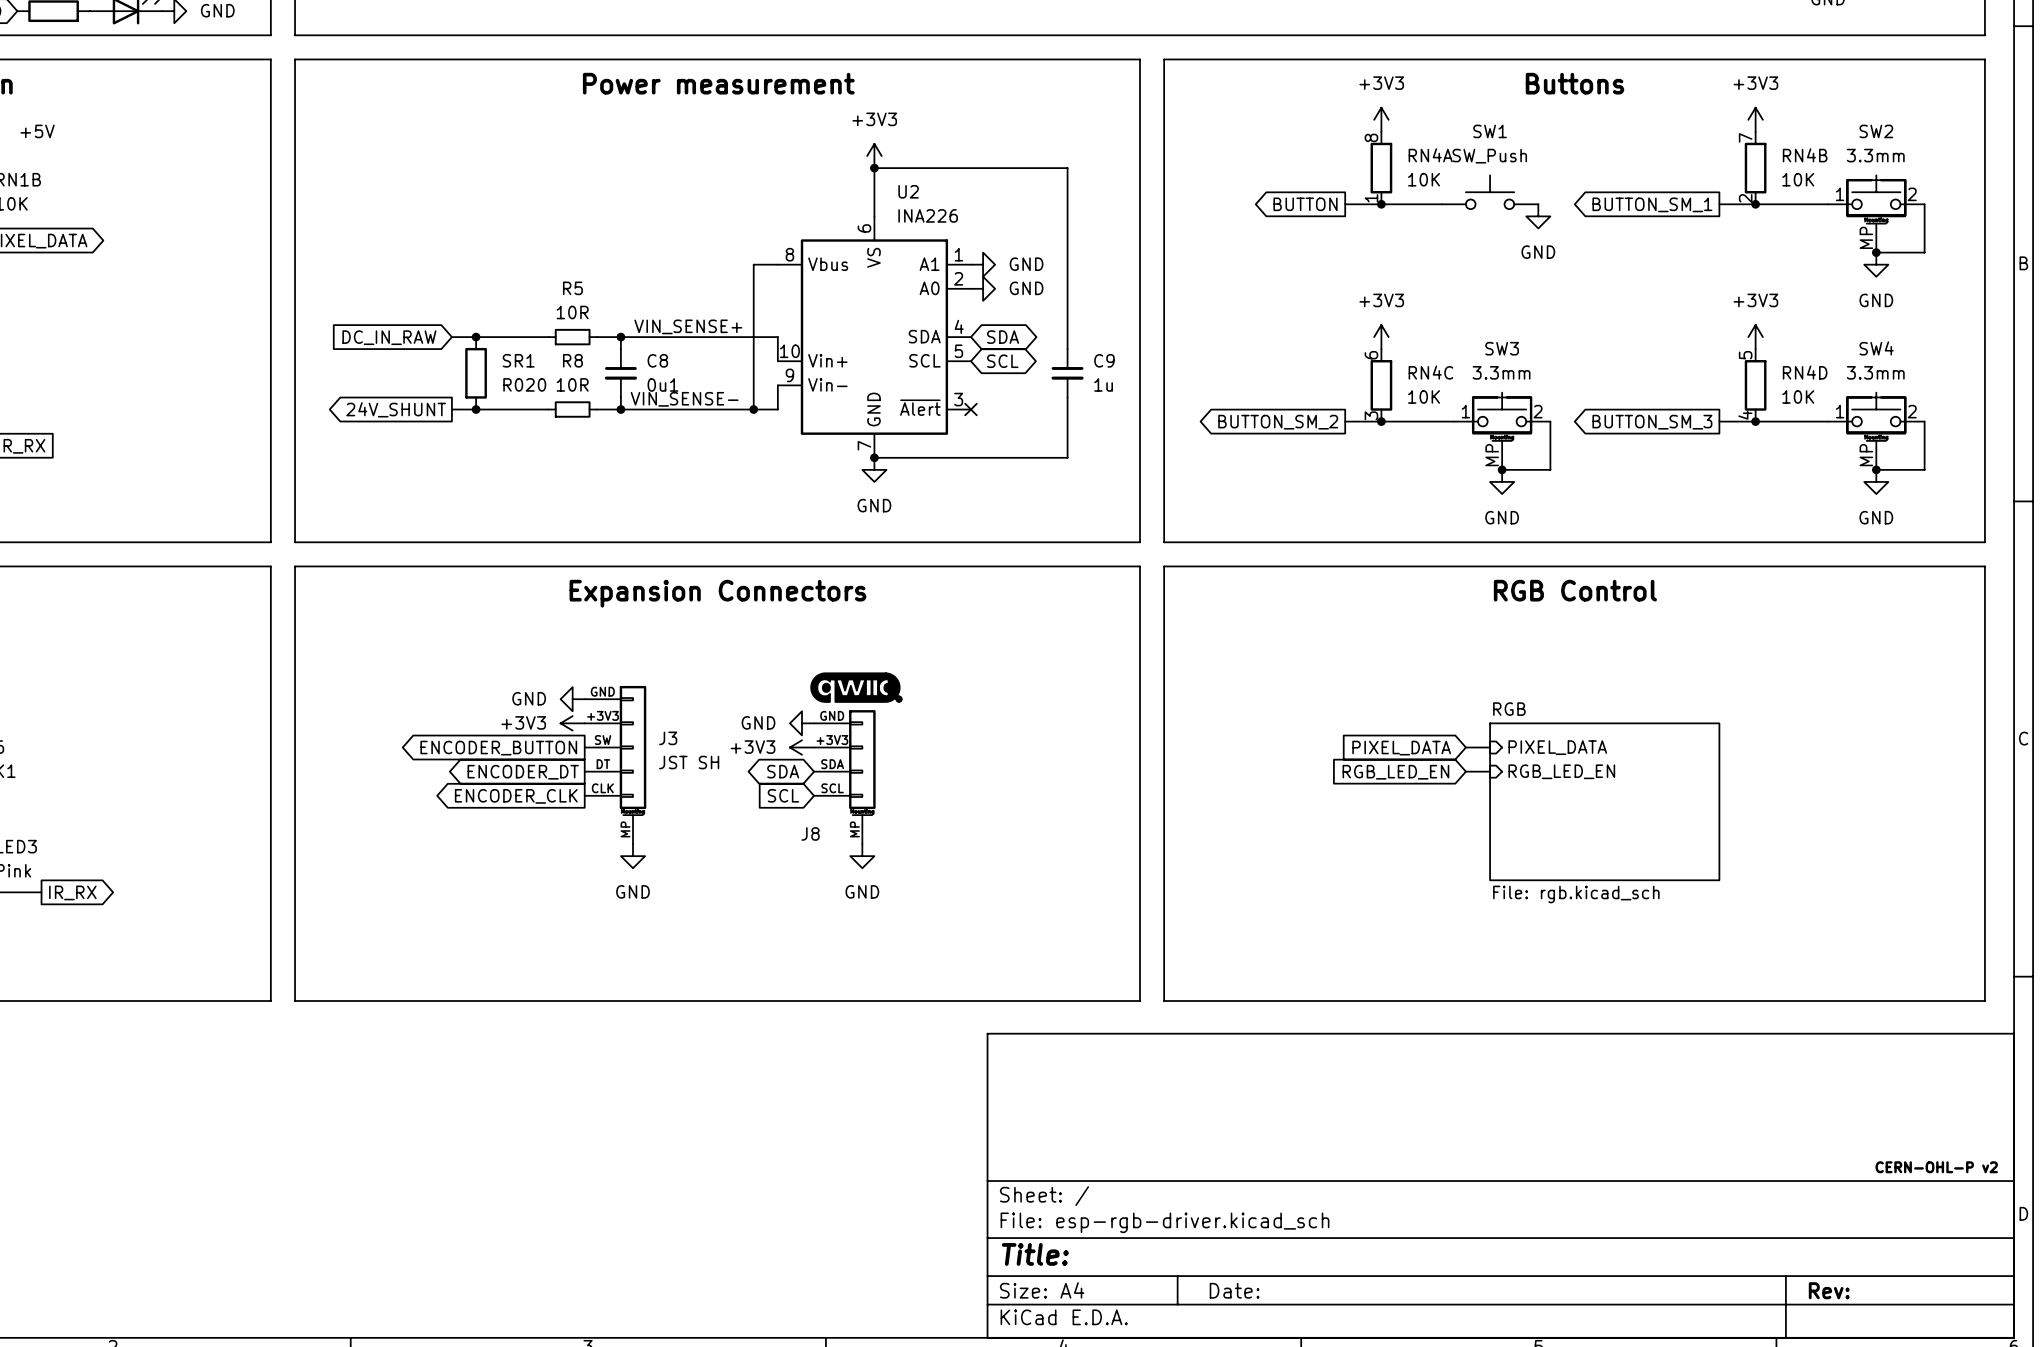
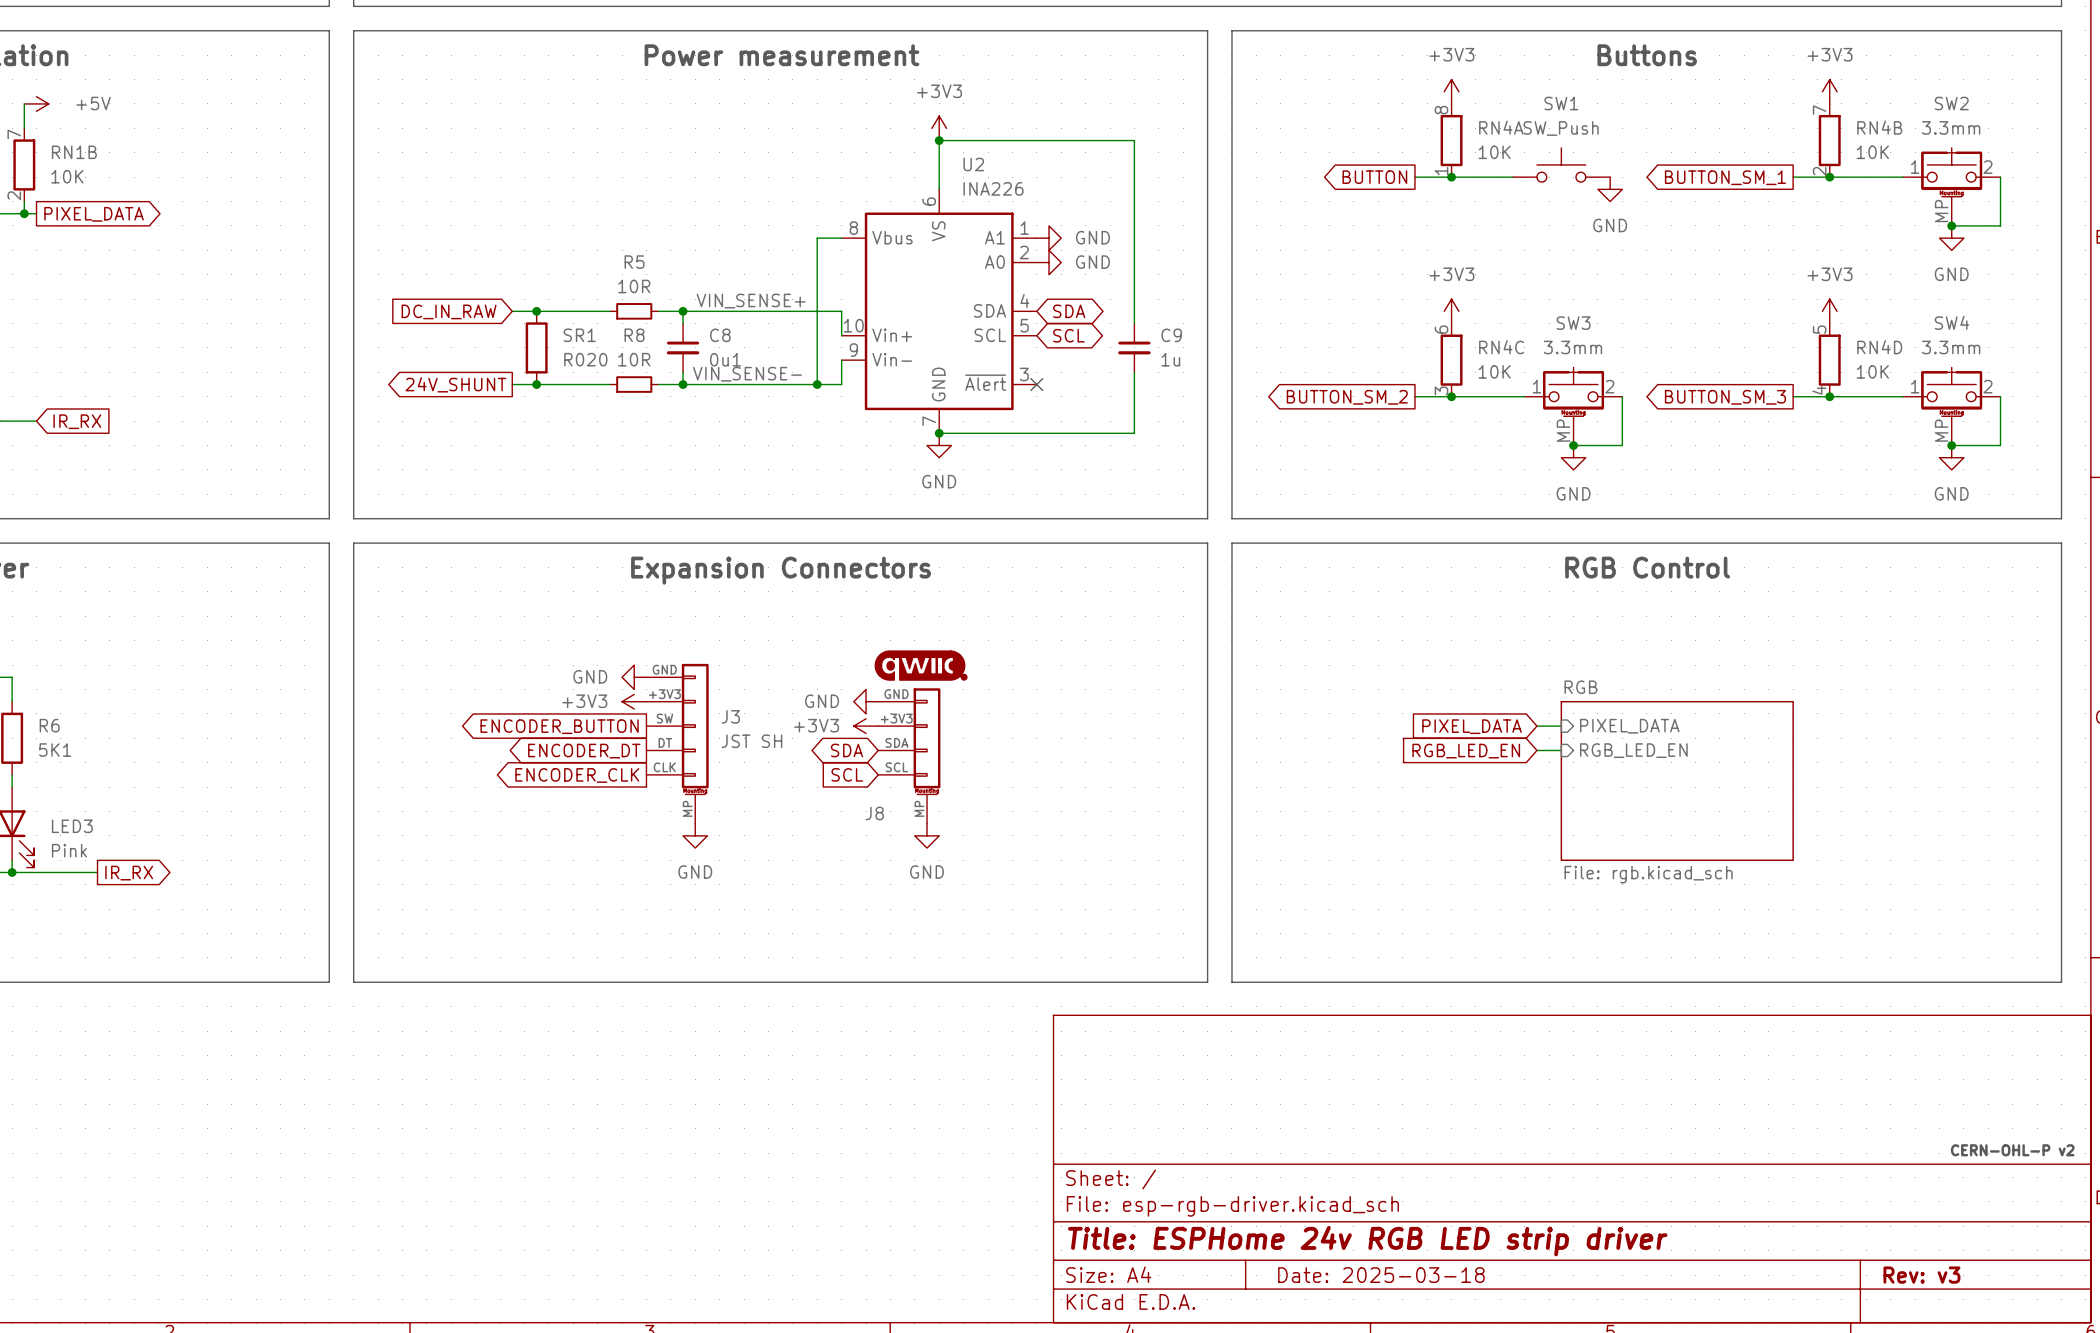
title block: Title: (1035, 1254) -> Title: ESPHome 24v RGB LED strip driver (1367, 1241)
title block: Date: (1234, 1290) -> Date: 2025-03-18 (1381, 1275)
title block: Rev: (1829, 1290) -> Rev: v3 (1921, 1275)

